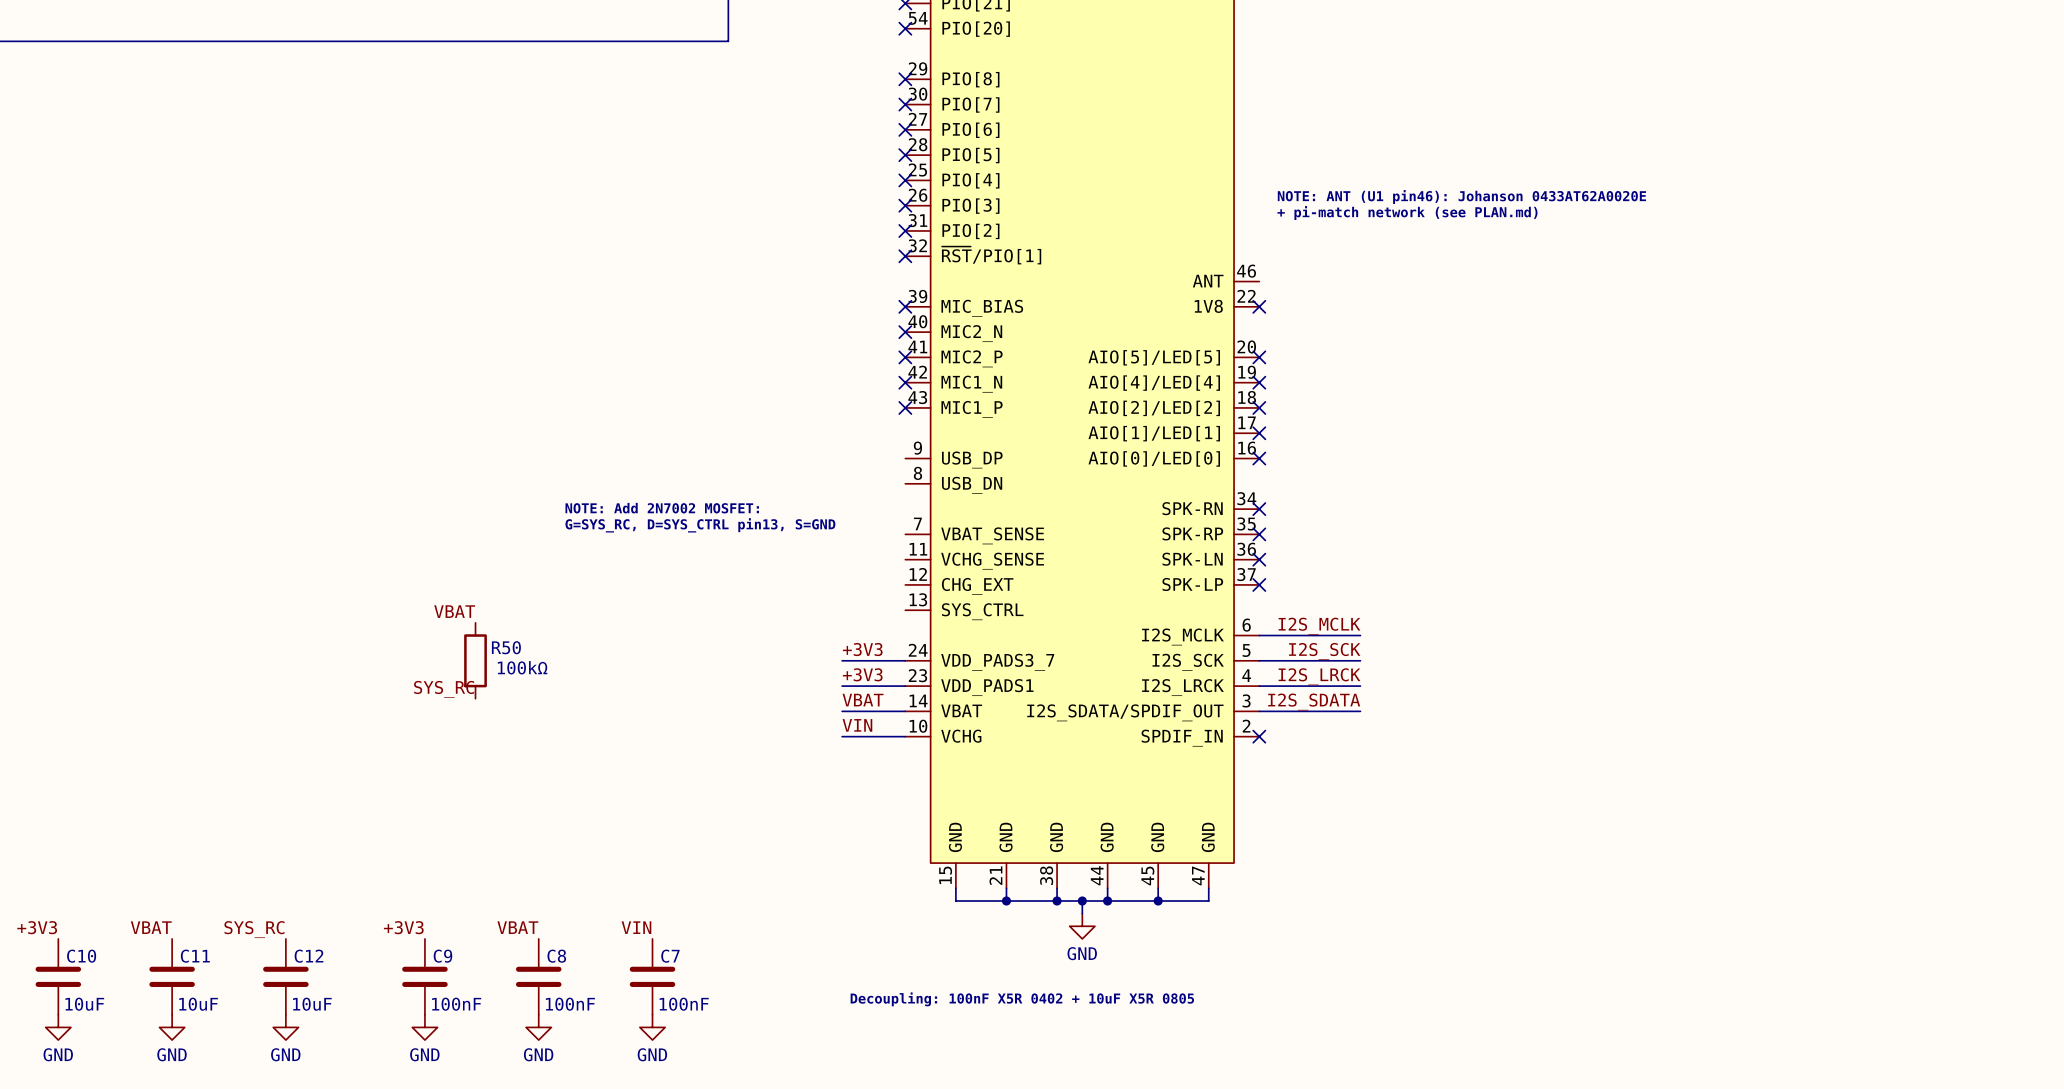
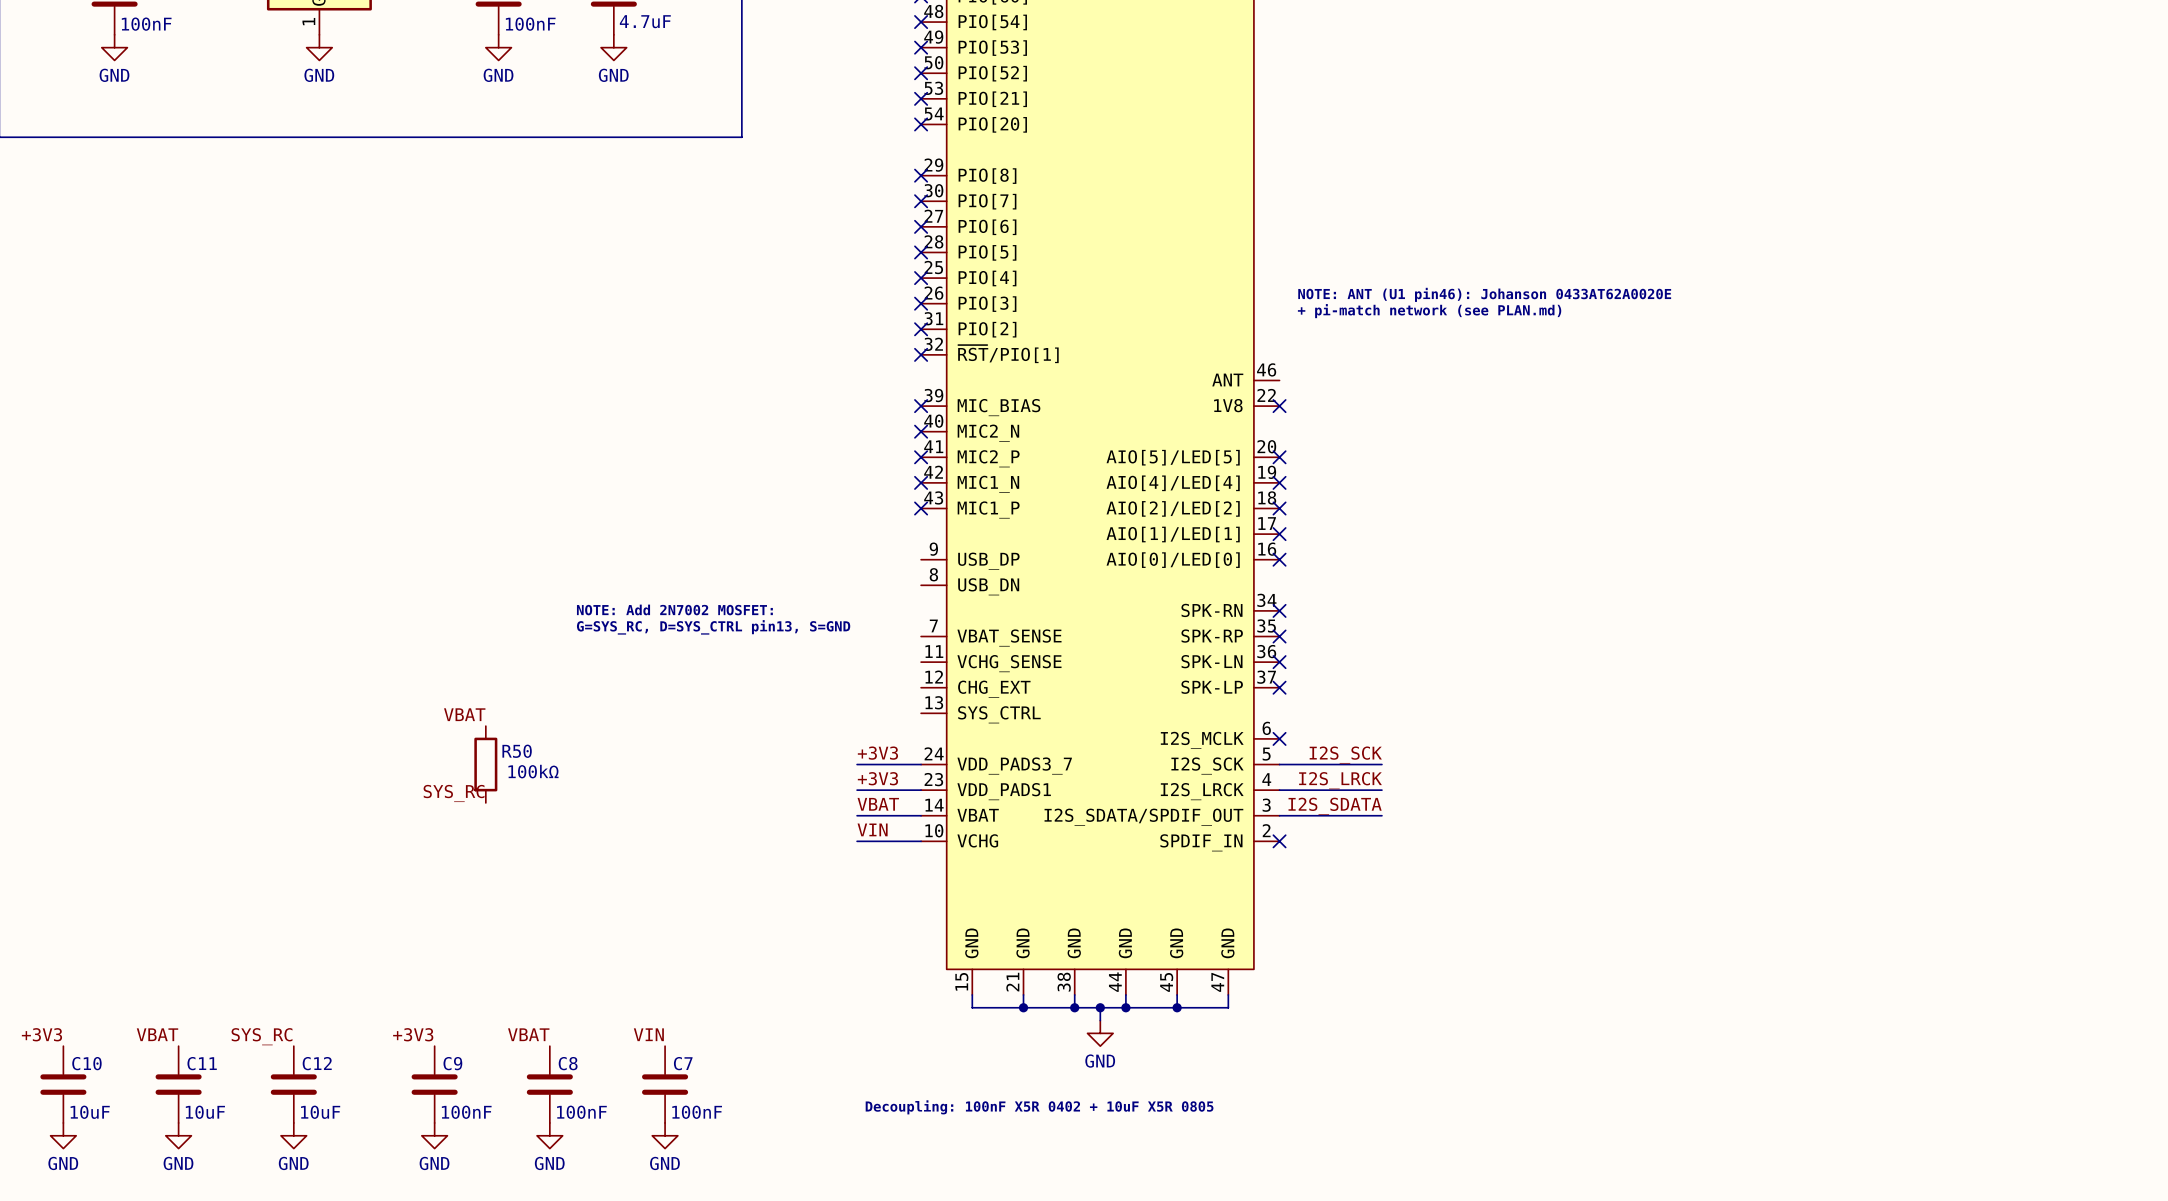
label: I2S_MCLK (1319, 626) -> none
wire: (1259, 635) (1360, 635) -> none
no-connect mark: none -> (1279, 738)

